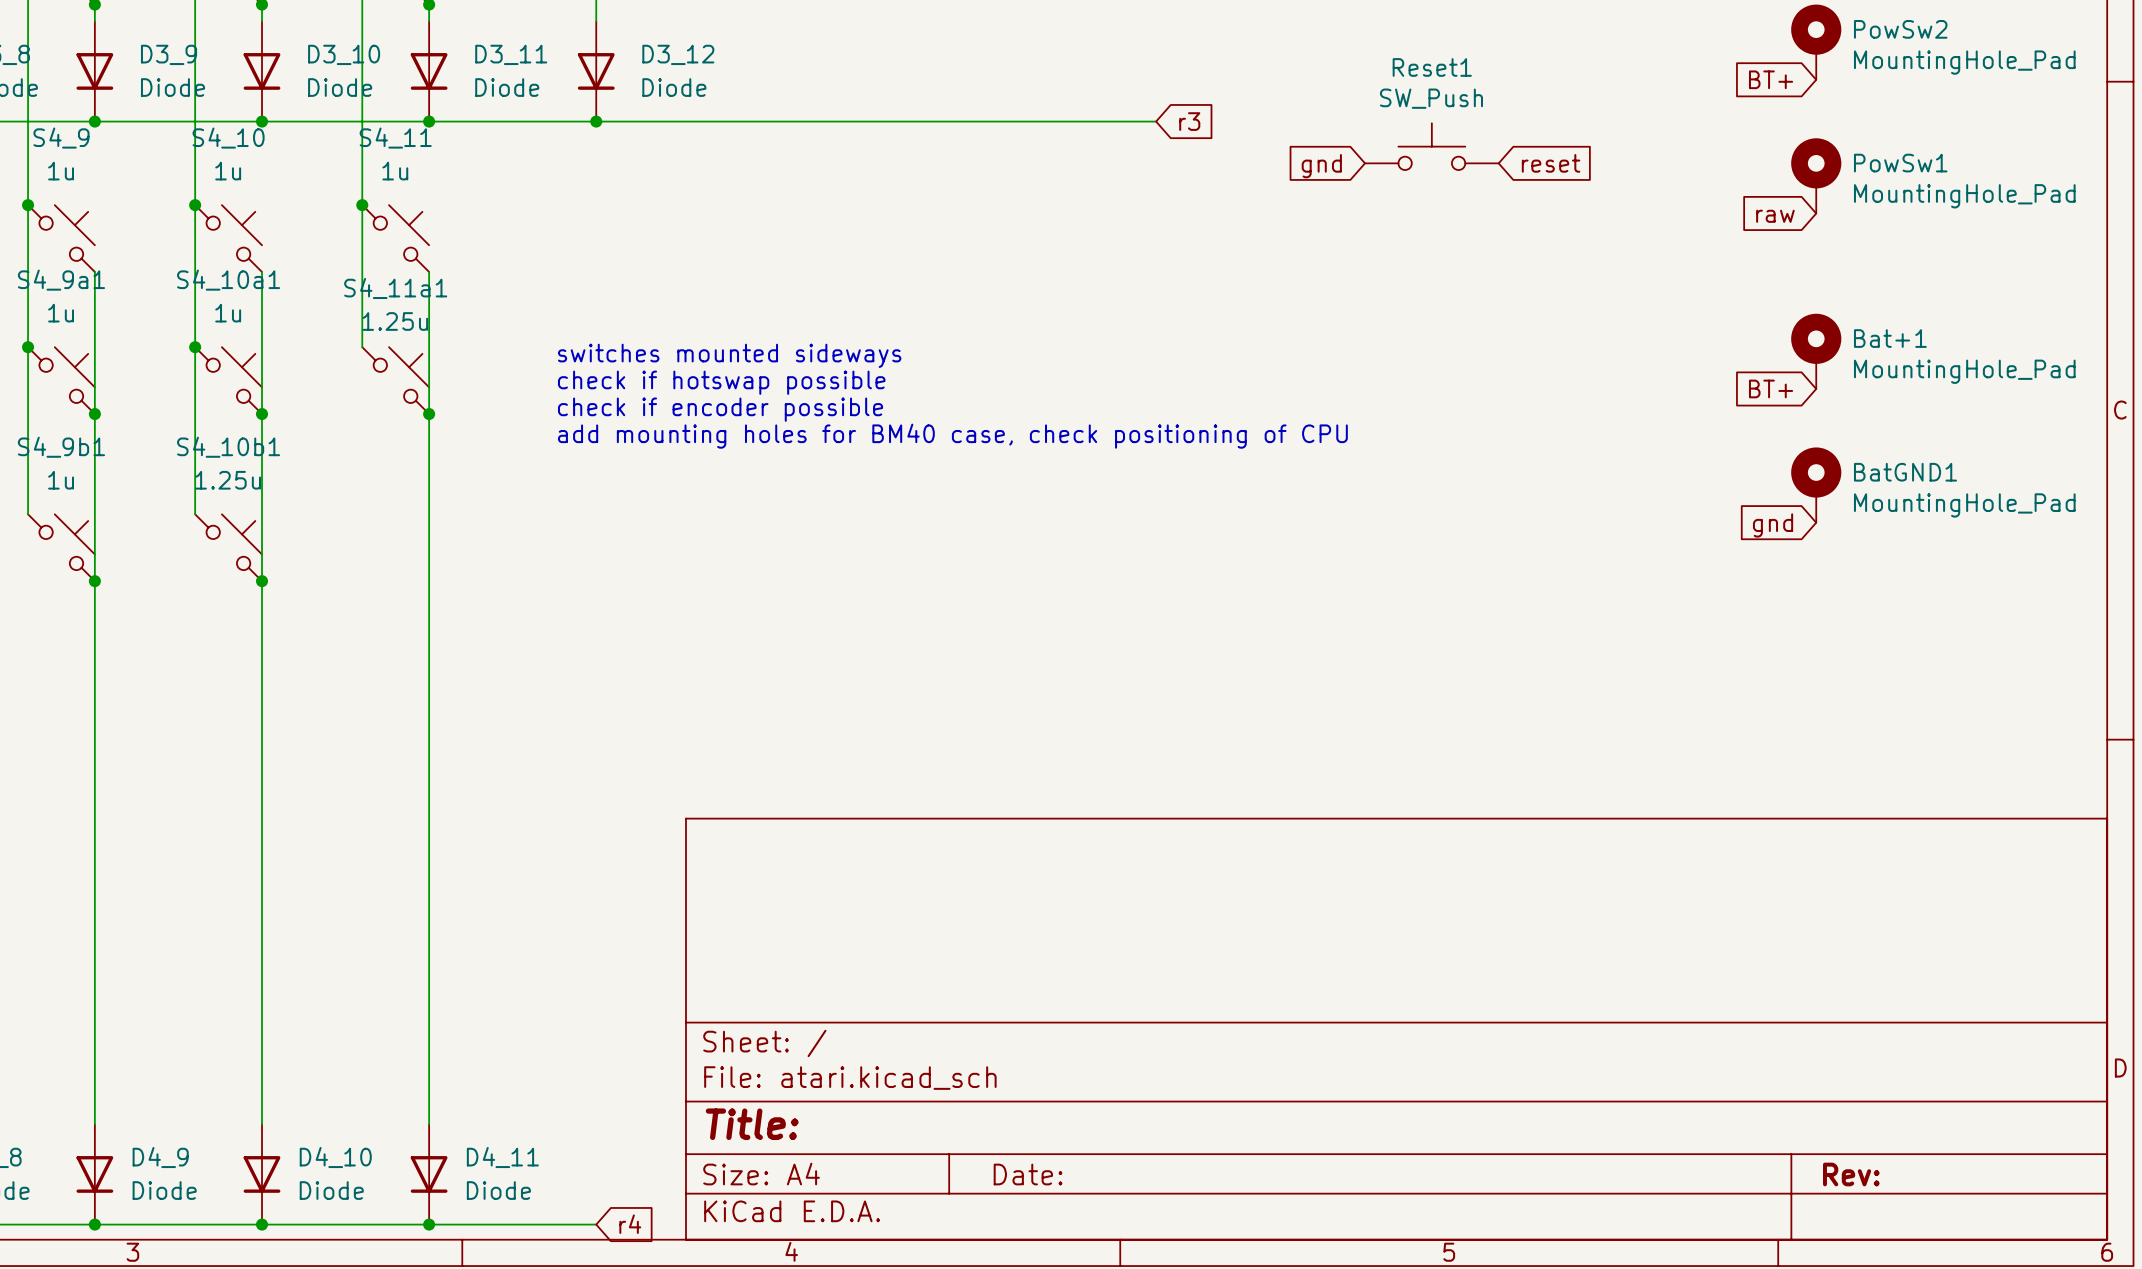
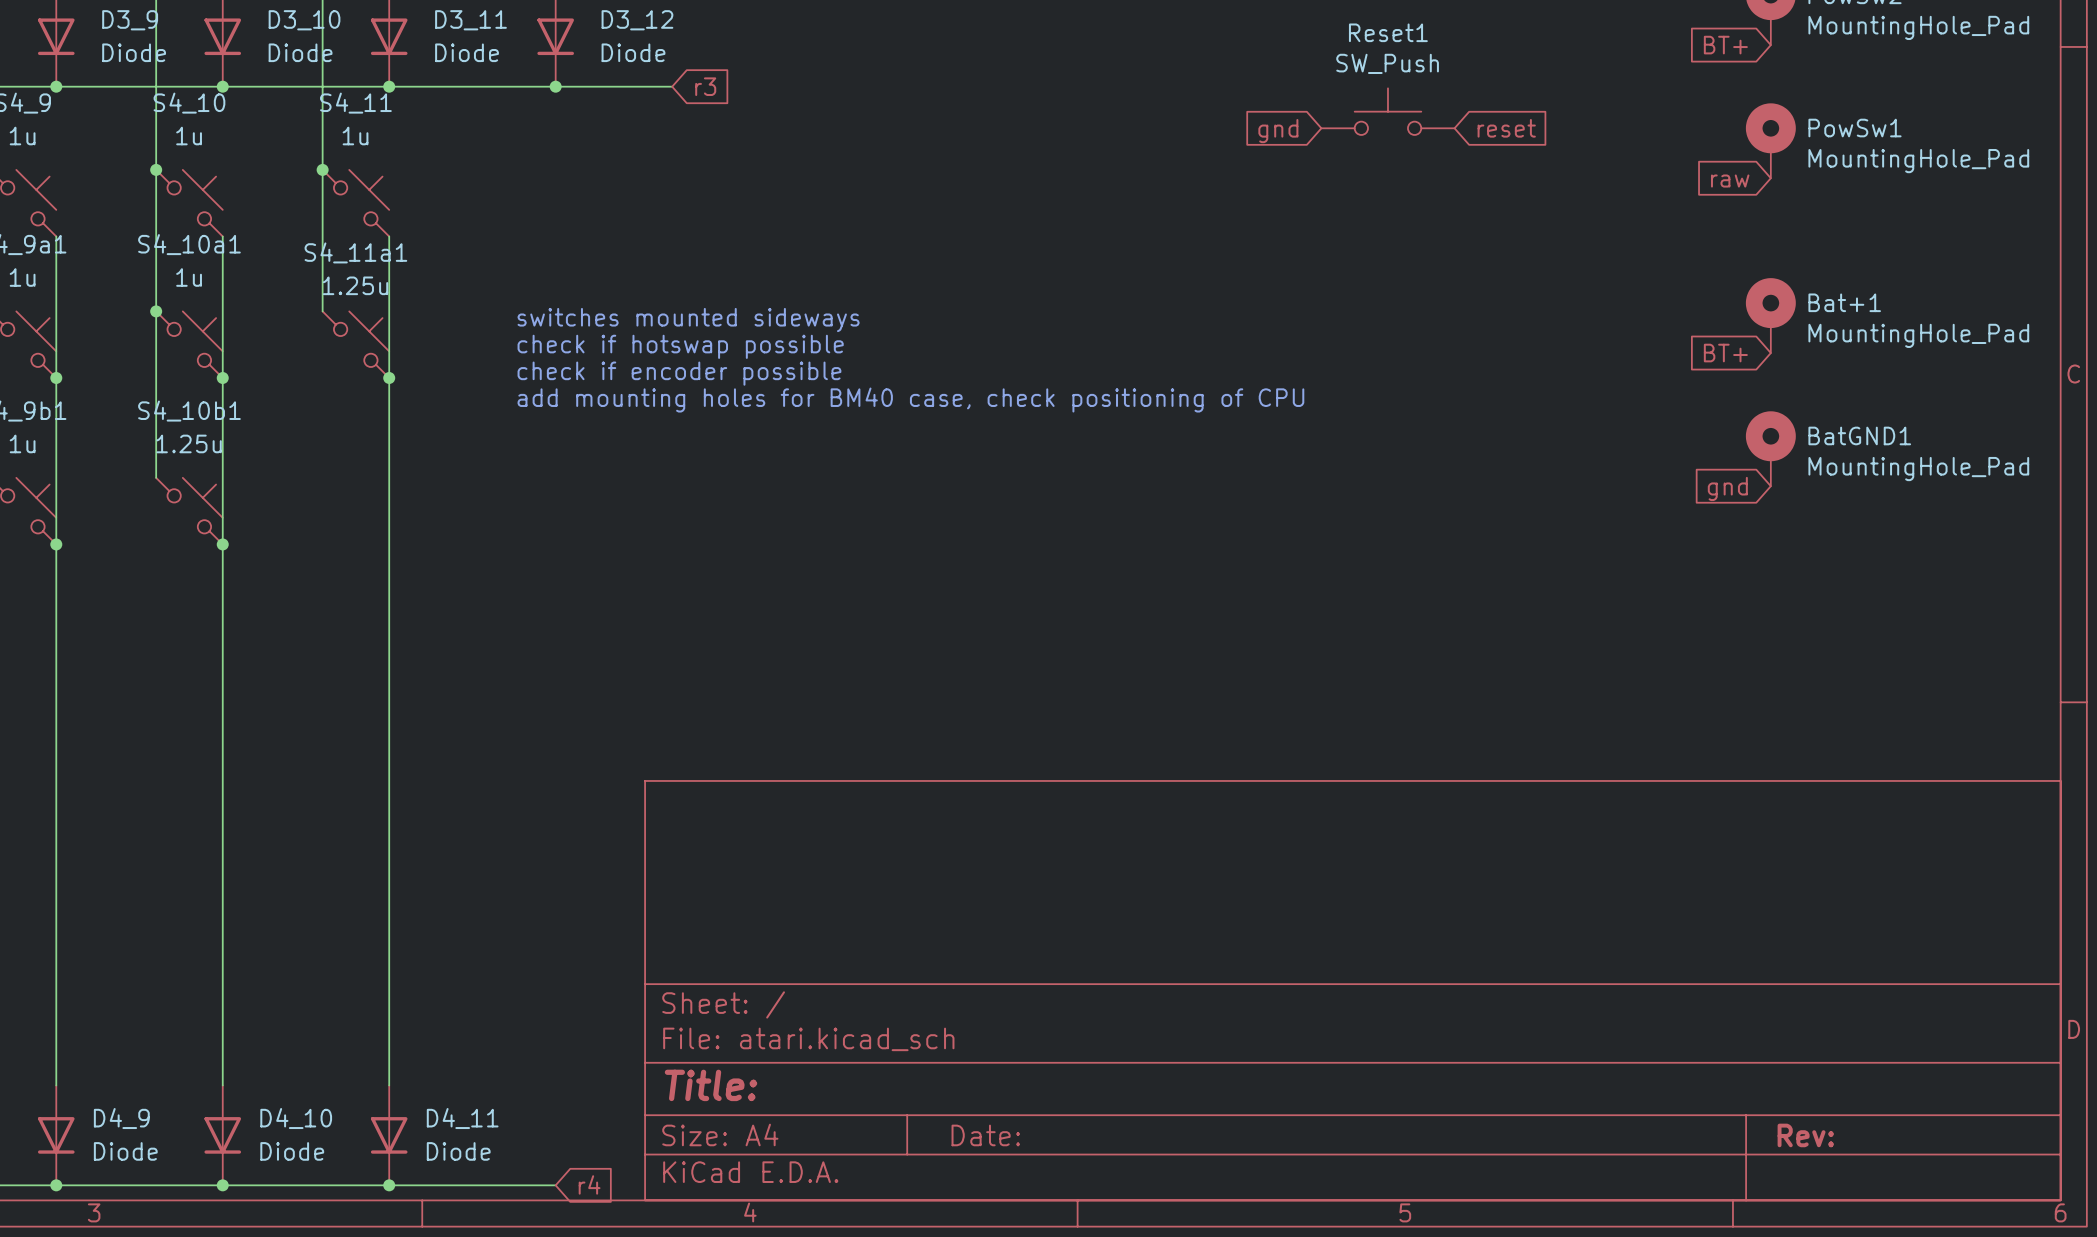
wire: (713, 121) (1156, 121) -> none
global label: none -> r3 (705, 86)
global label: r3 (1189, 121) -> none

